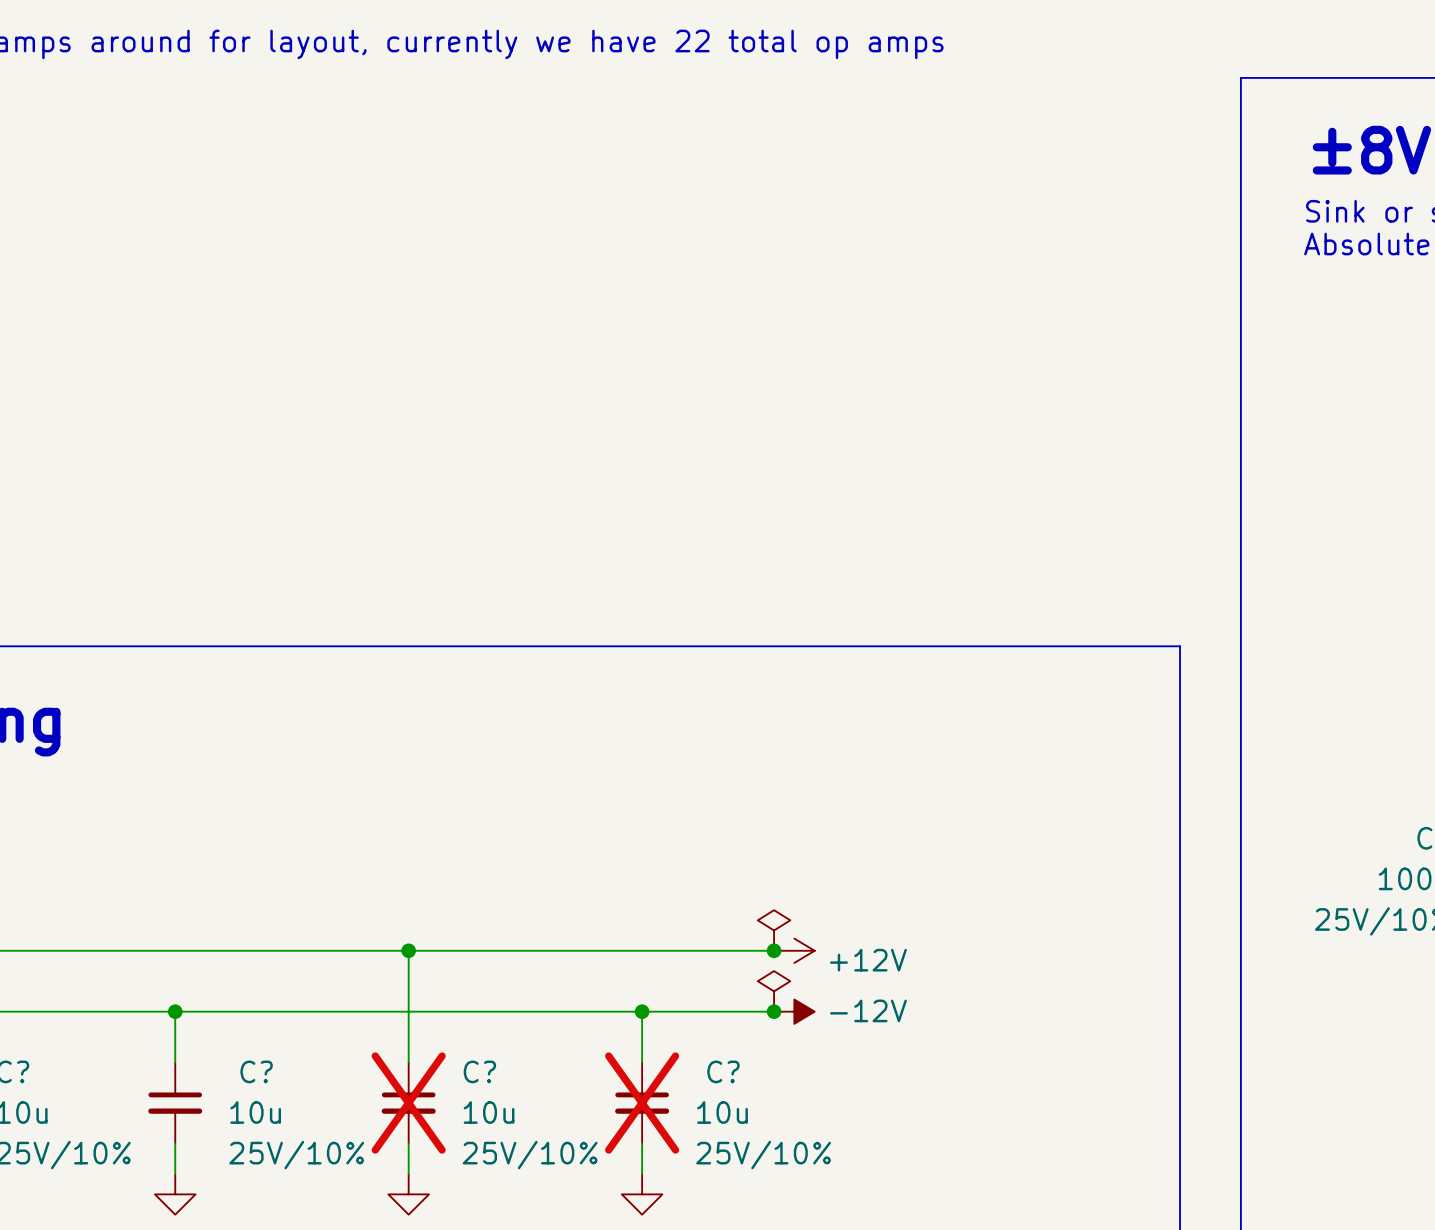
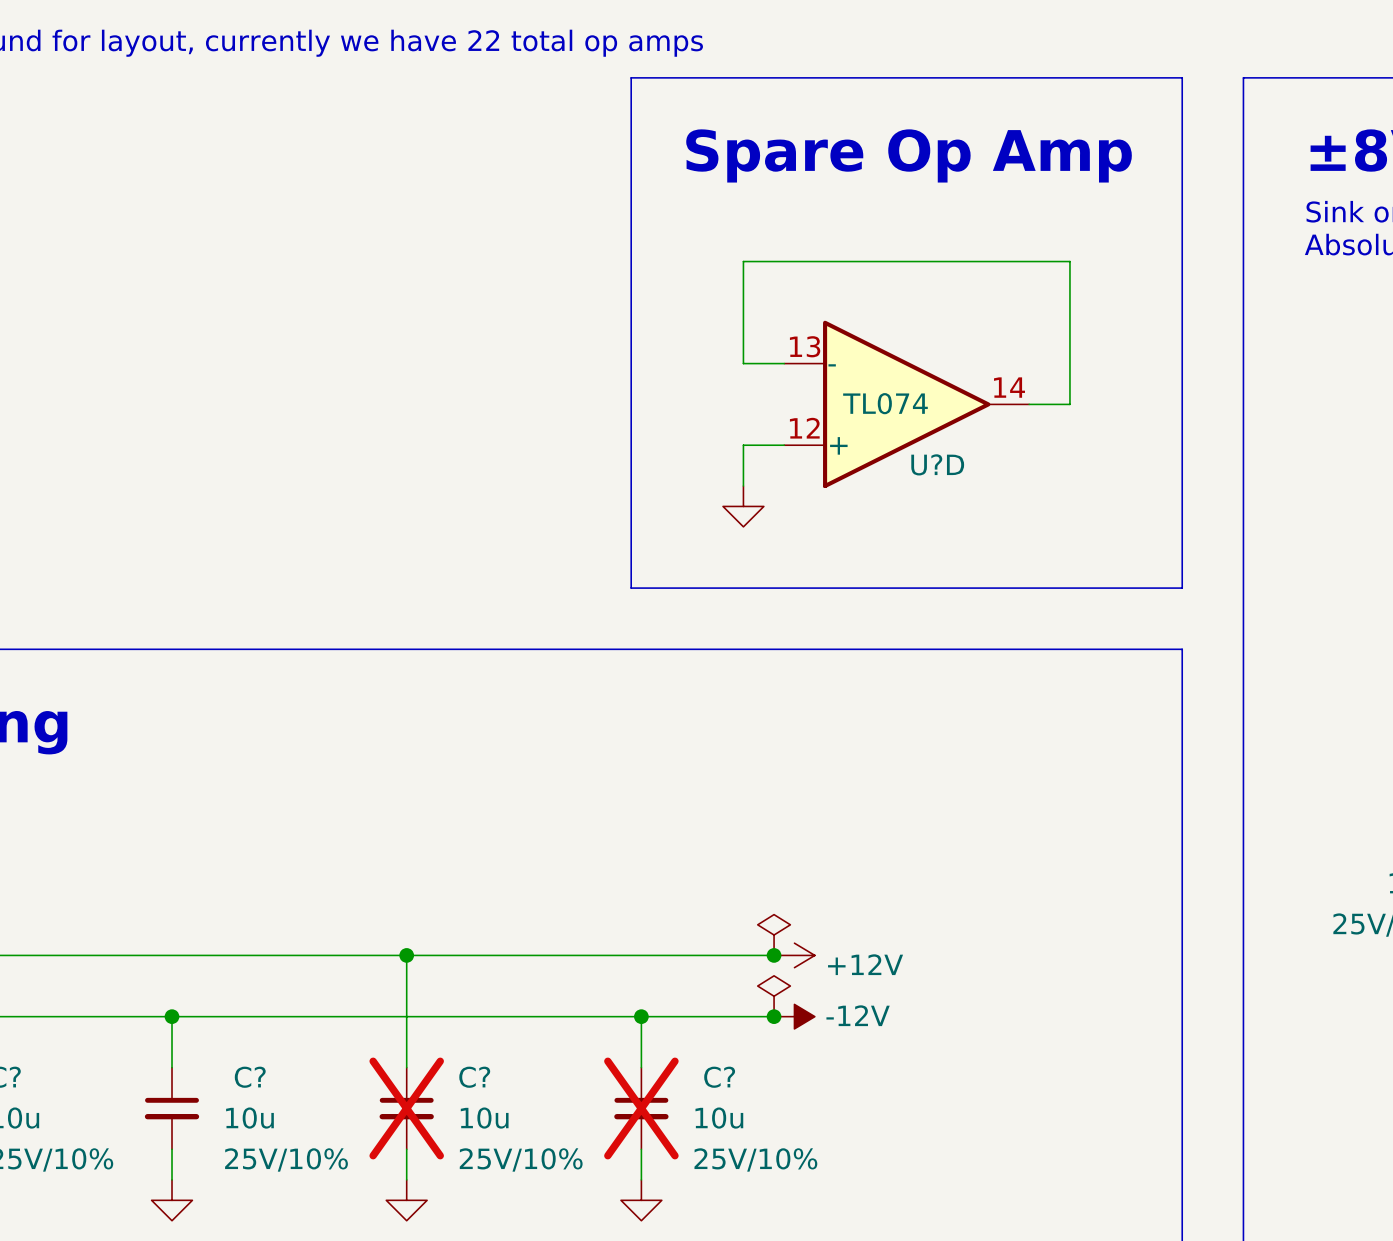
line: none -> (631, 77) (1182, 77) (1182, 588) (631, 588) (631, 77)
text: none -> Spare Op Amp (909, 155)
wire: none -> (784, 363) (743, 363) (743, 261) (1069, 261) (1069, 404) (1029, 404)
U?D: none -> TL074 (906, 404)
wire: none -> (784, 445) (743, 445) (743, 486)
power symbol: none -> (743, 506)

